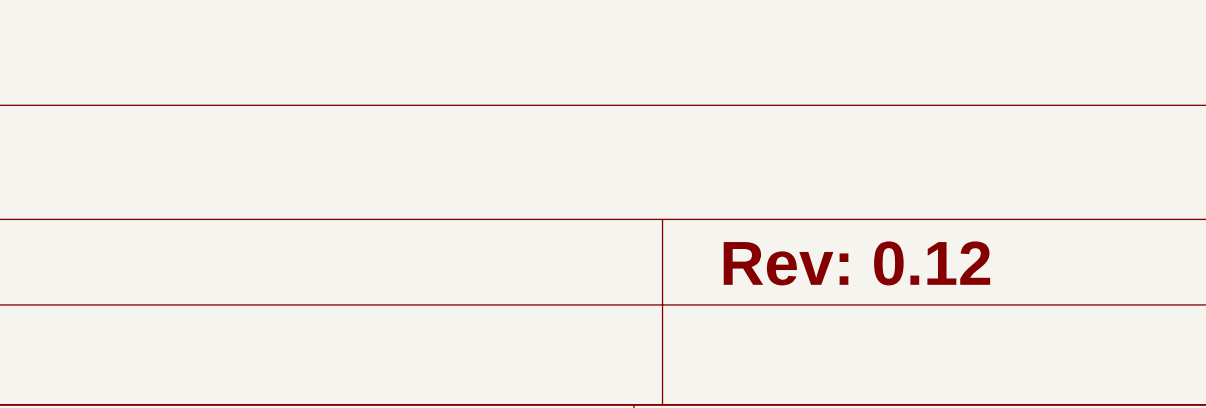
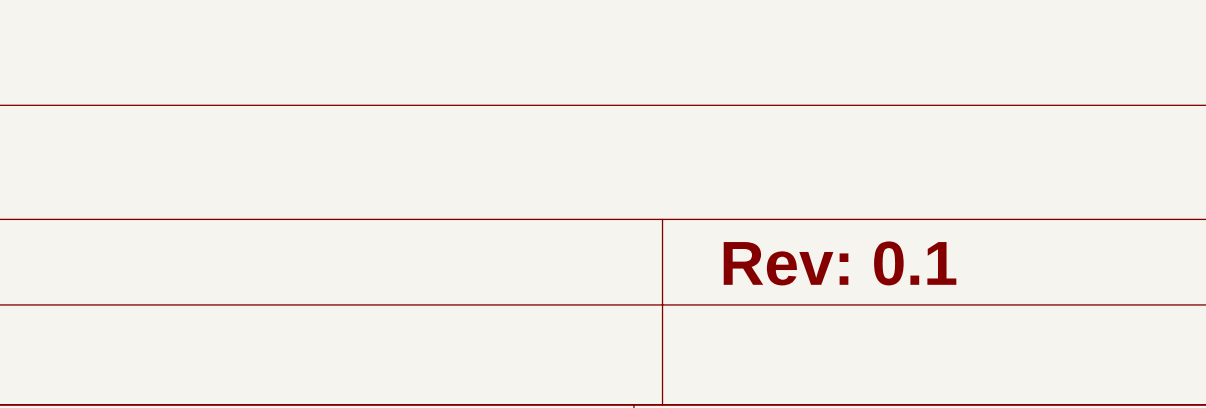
title block: Rev: 0.12 (856, 263) -> Rev: 0.1 (840, 263)

